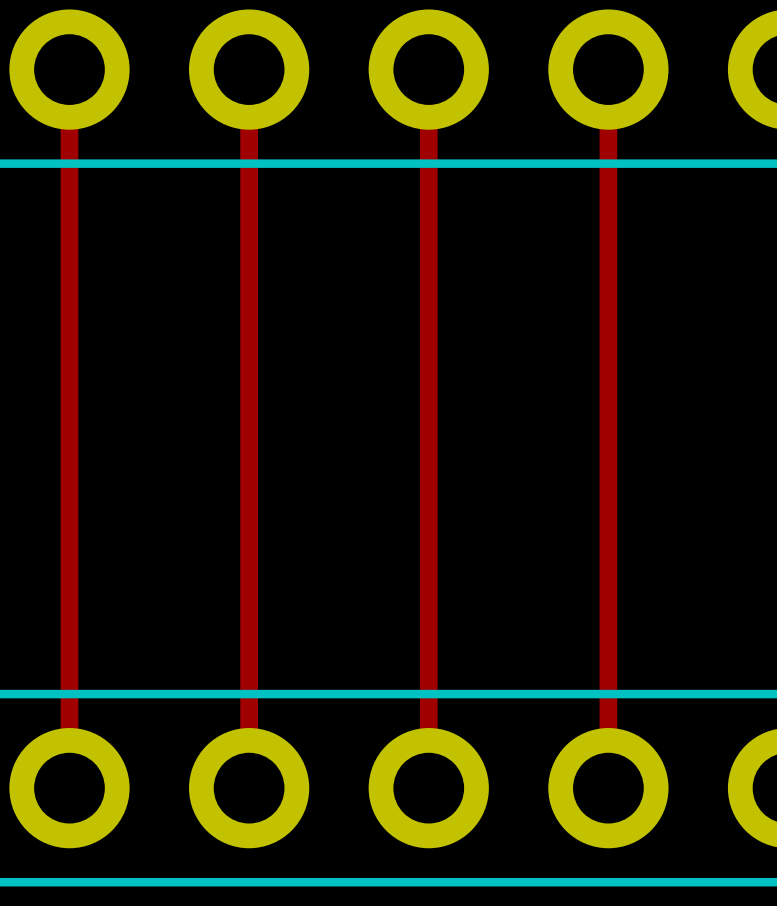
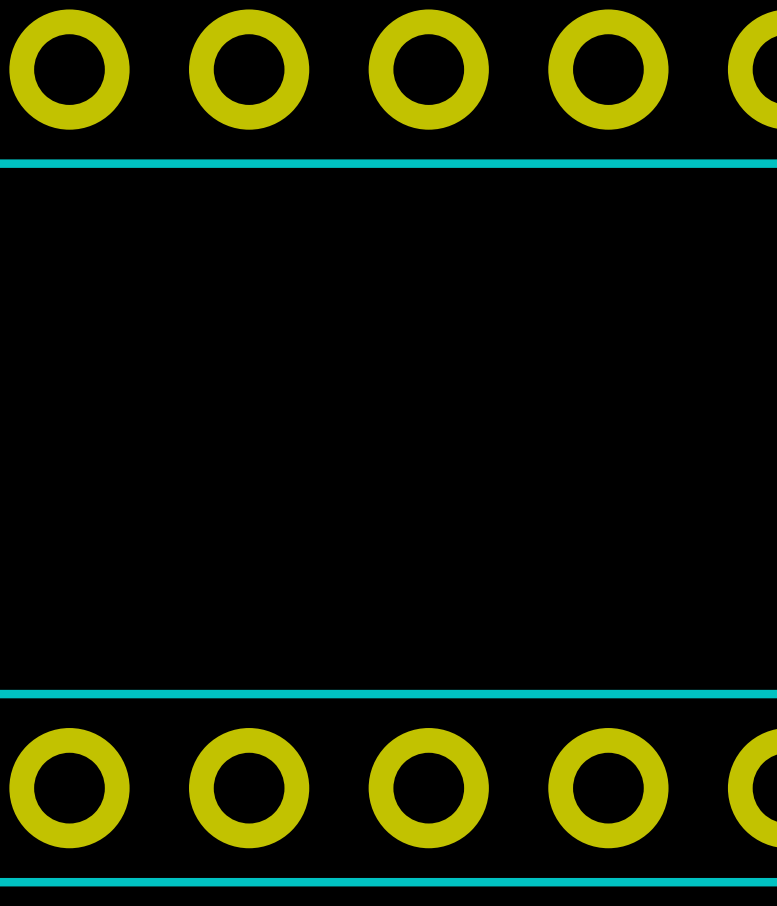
top track: (69, 69) (69, 788) -> none
top track: (249, 69) (249, 788) -> none
top track: (428, 69) (428, 788) -> none
top track: (608, 69) (608, 788) -> none

